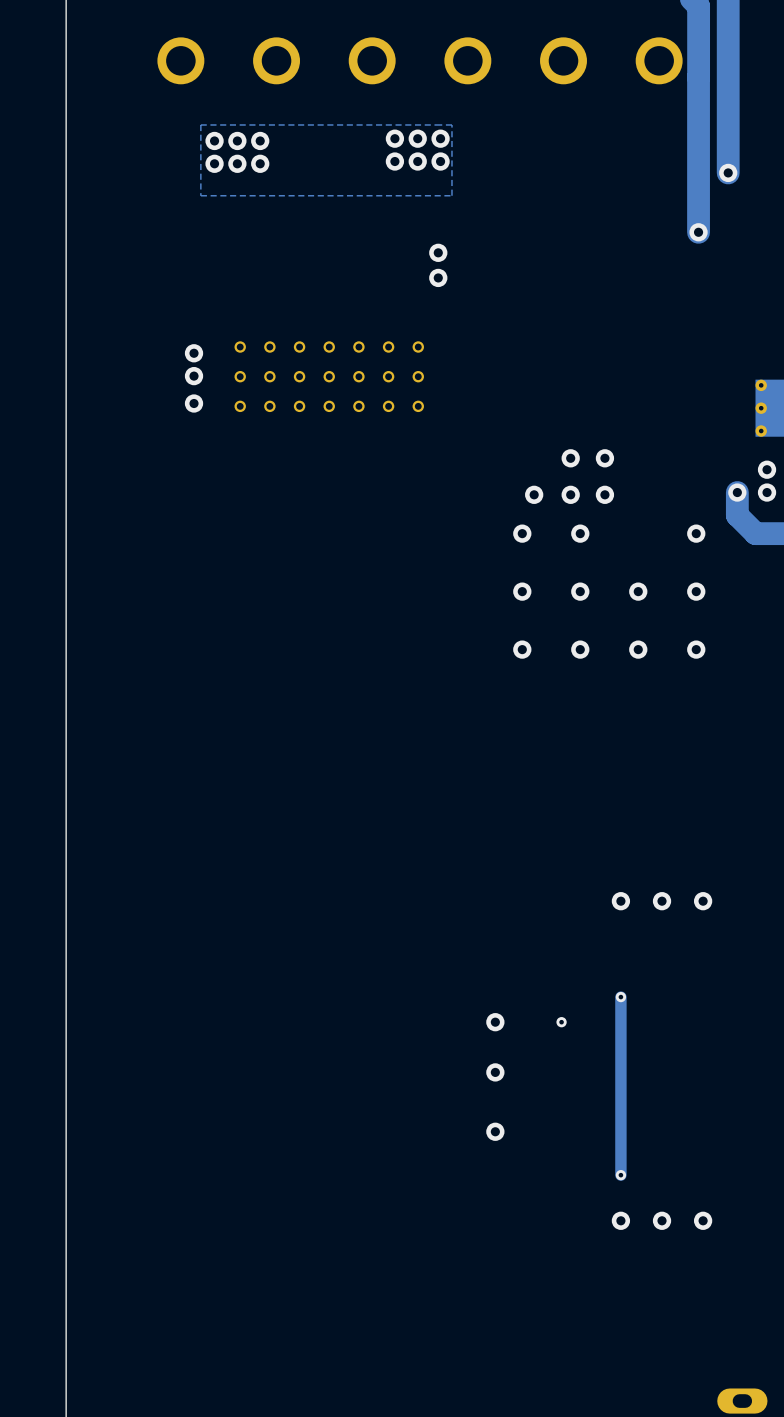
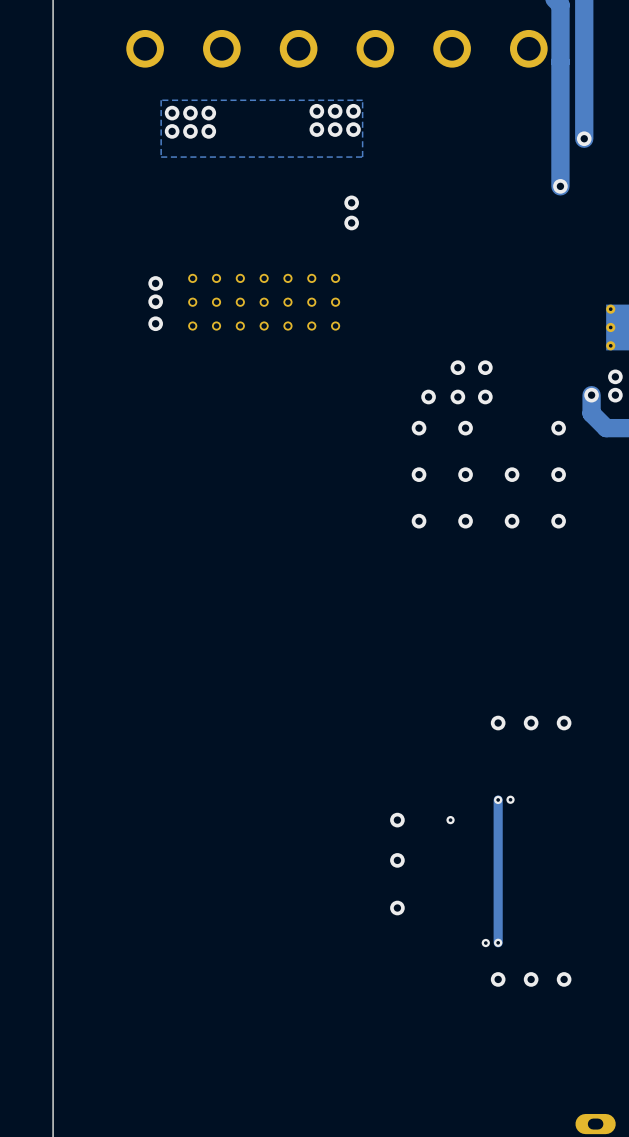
via: none -> (510, 799)
via: none -> (485, 943)

